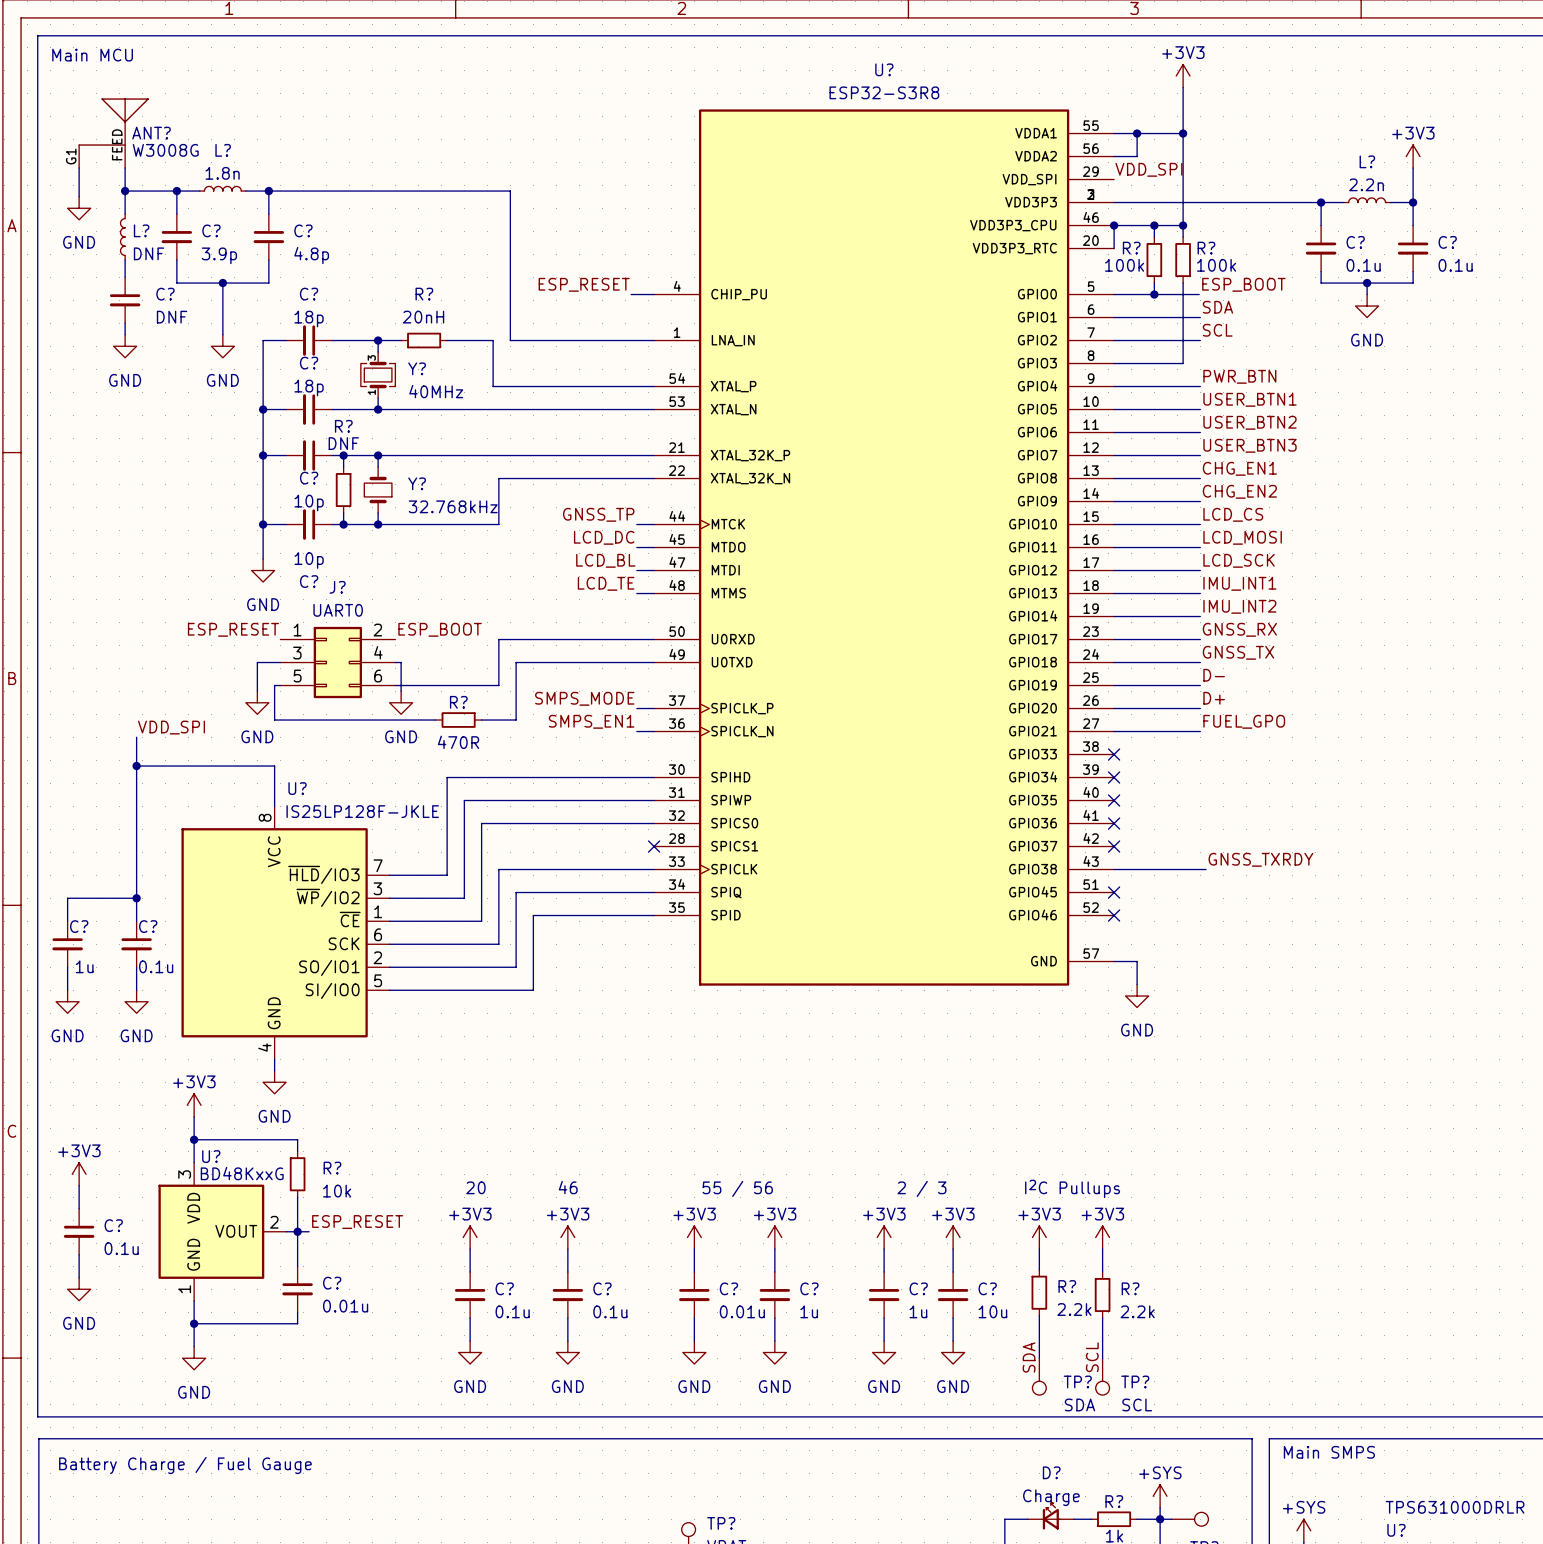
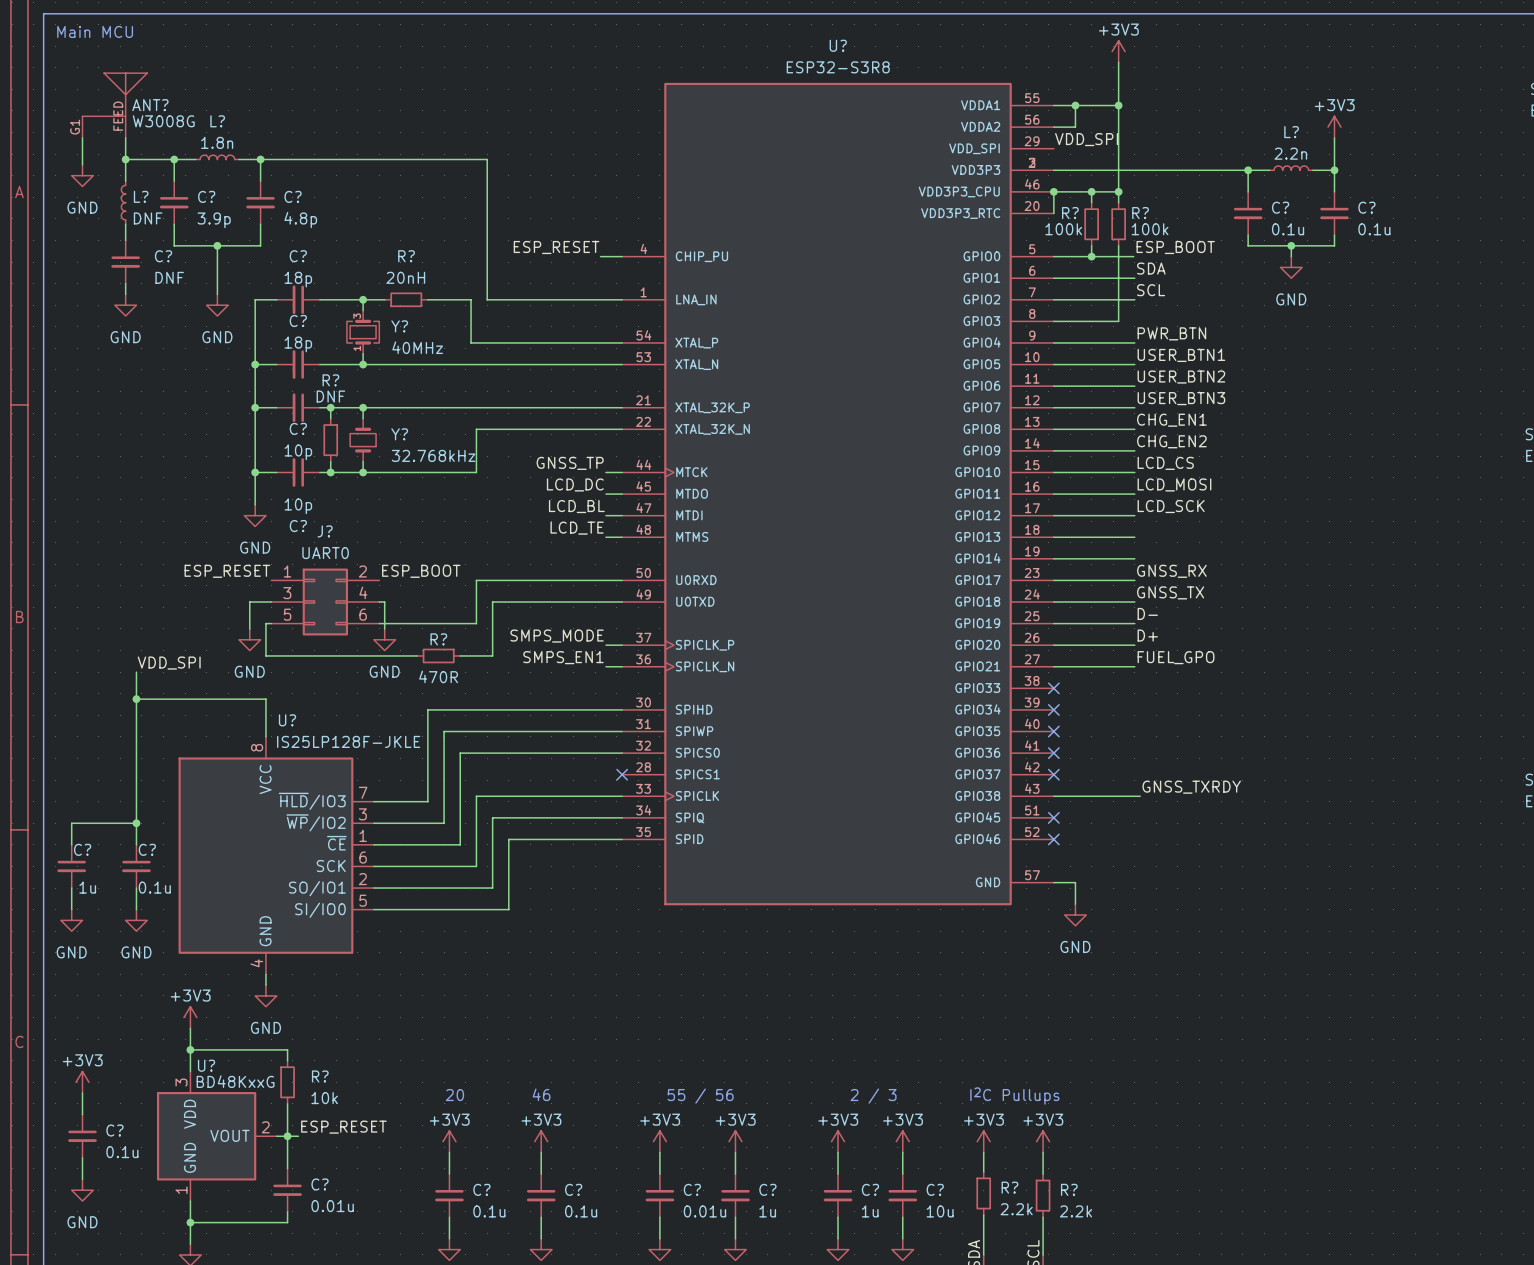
label: IMU_INT1 (1239, 583) -> none
label: IMU_INT2 (1239, 606) -> none

